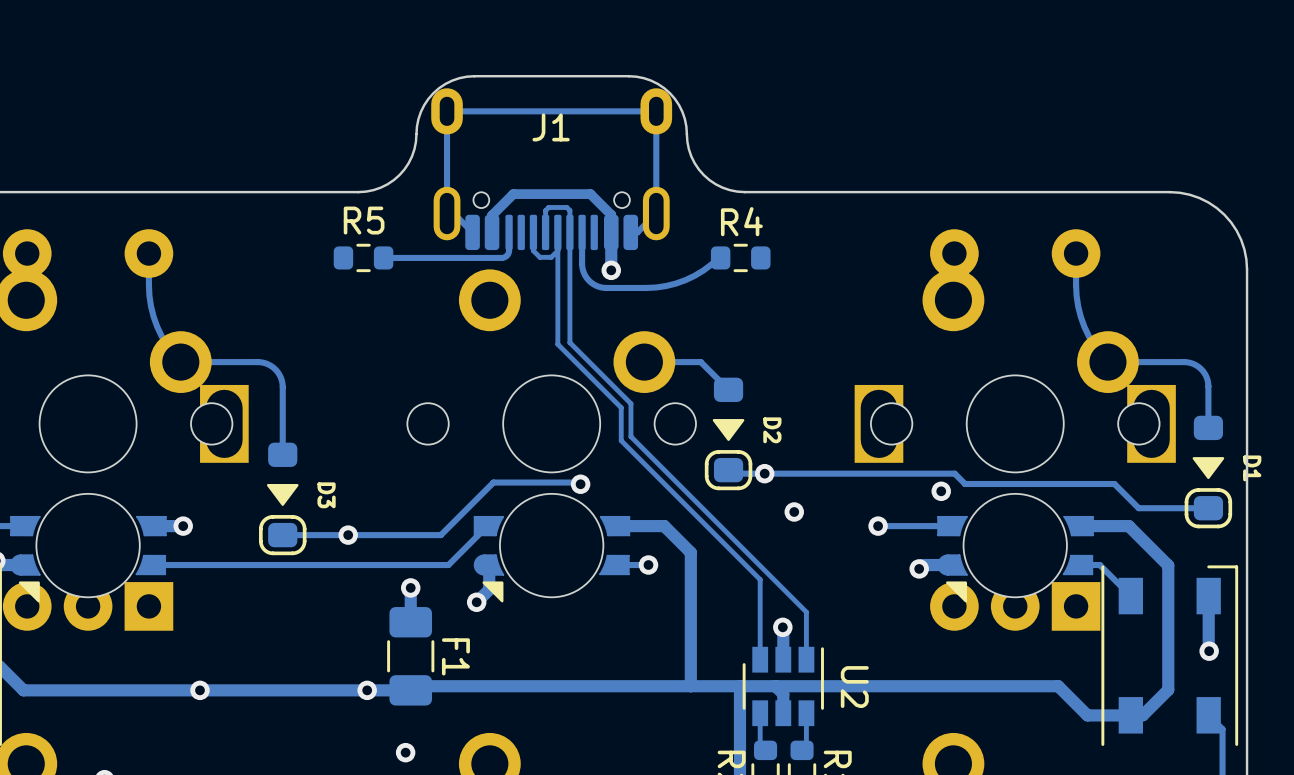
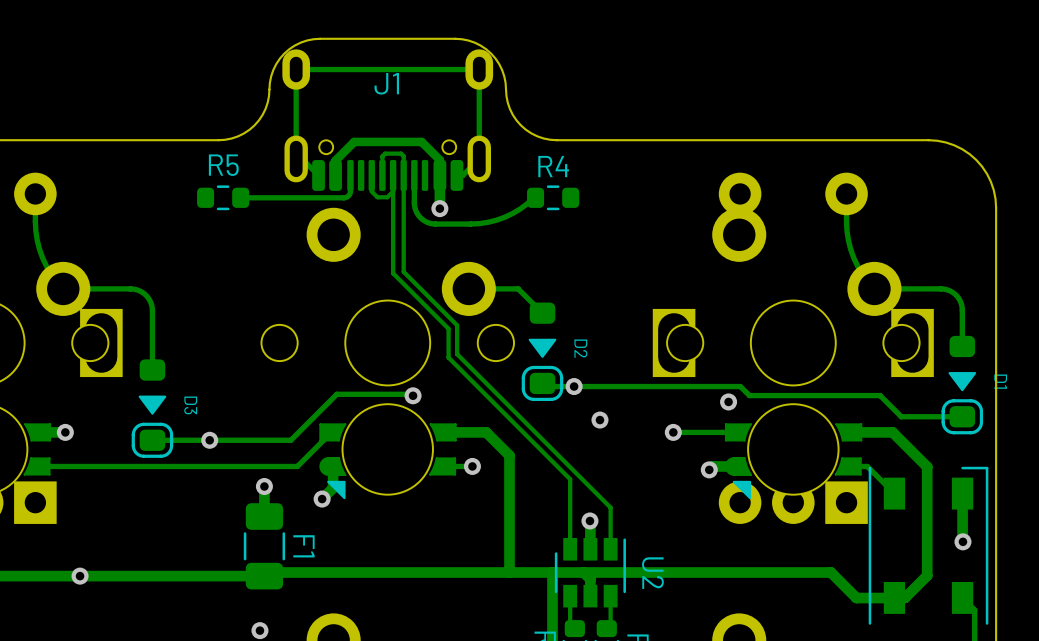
via: (367, 690) -> none

